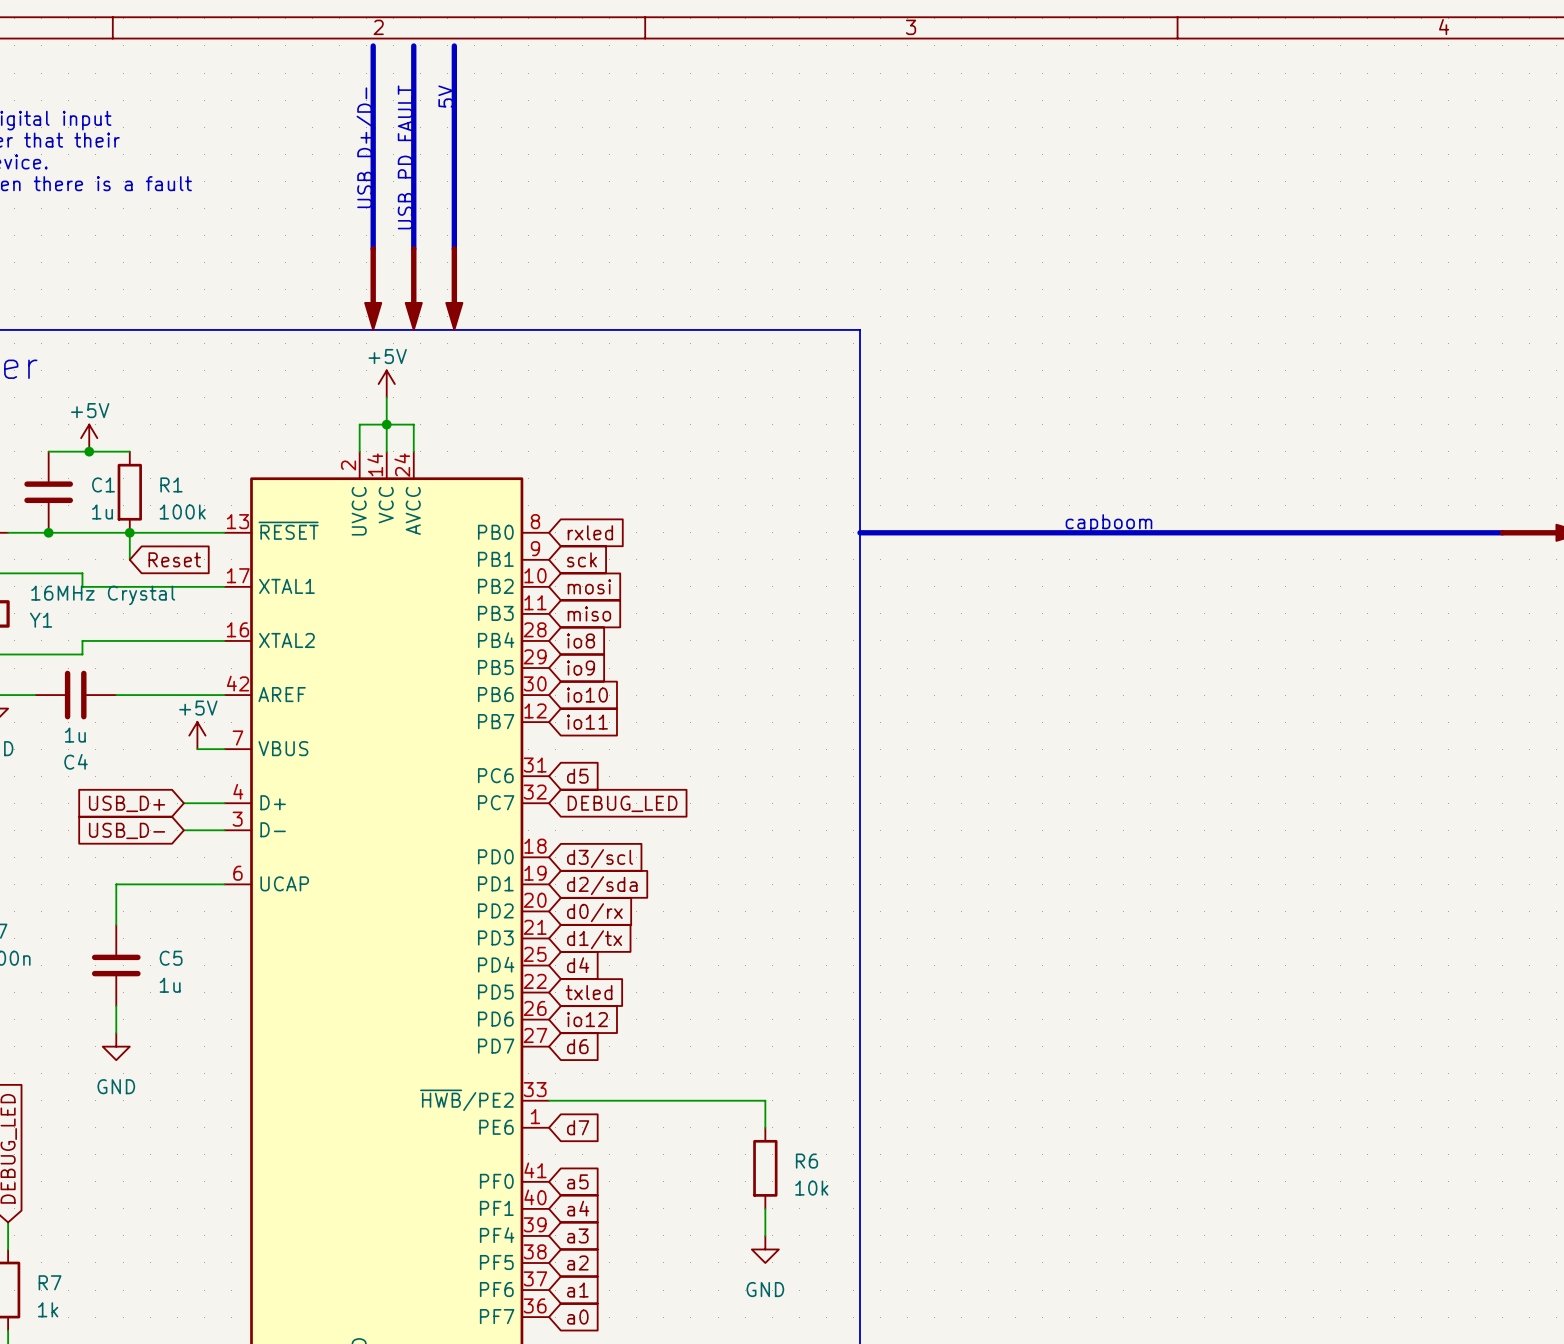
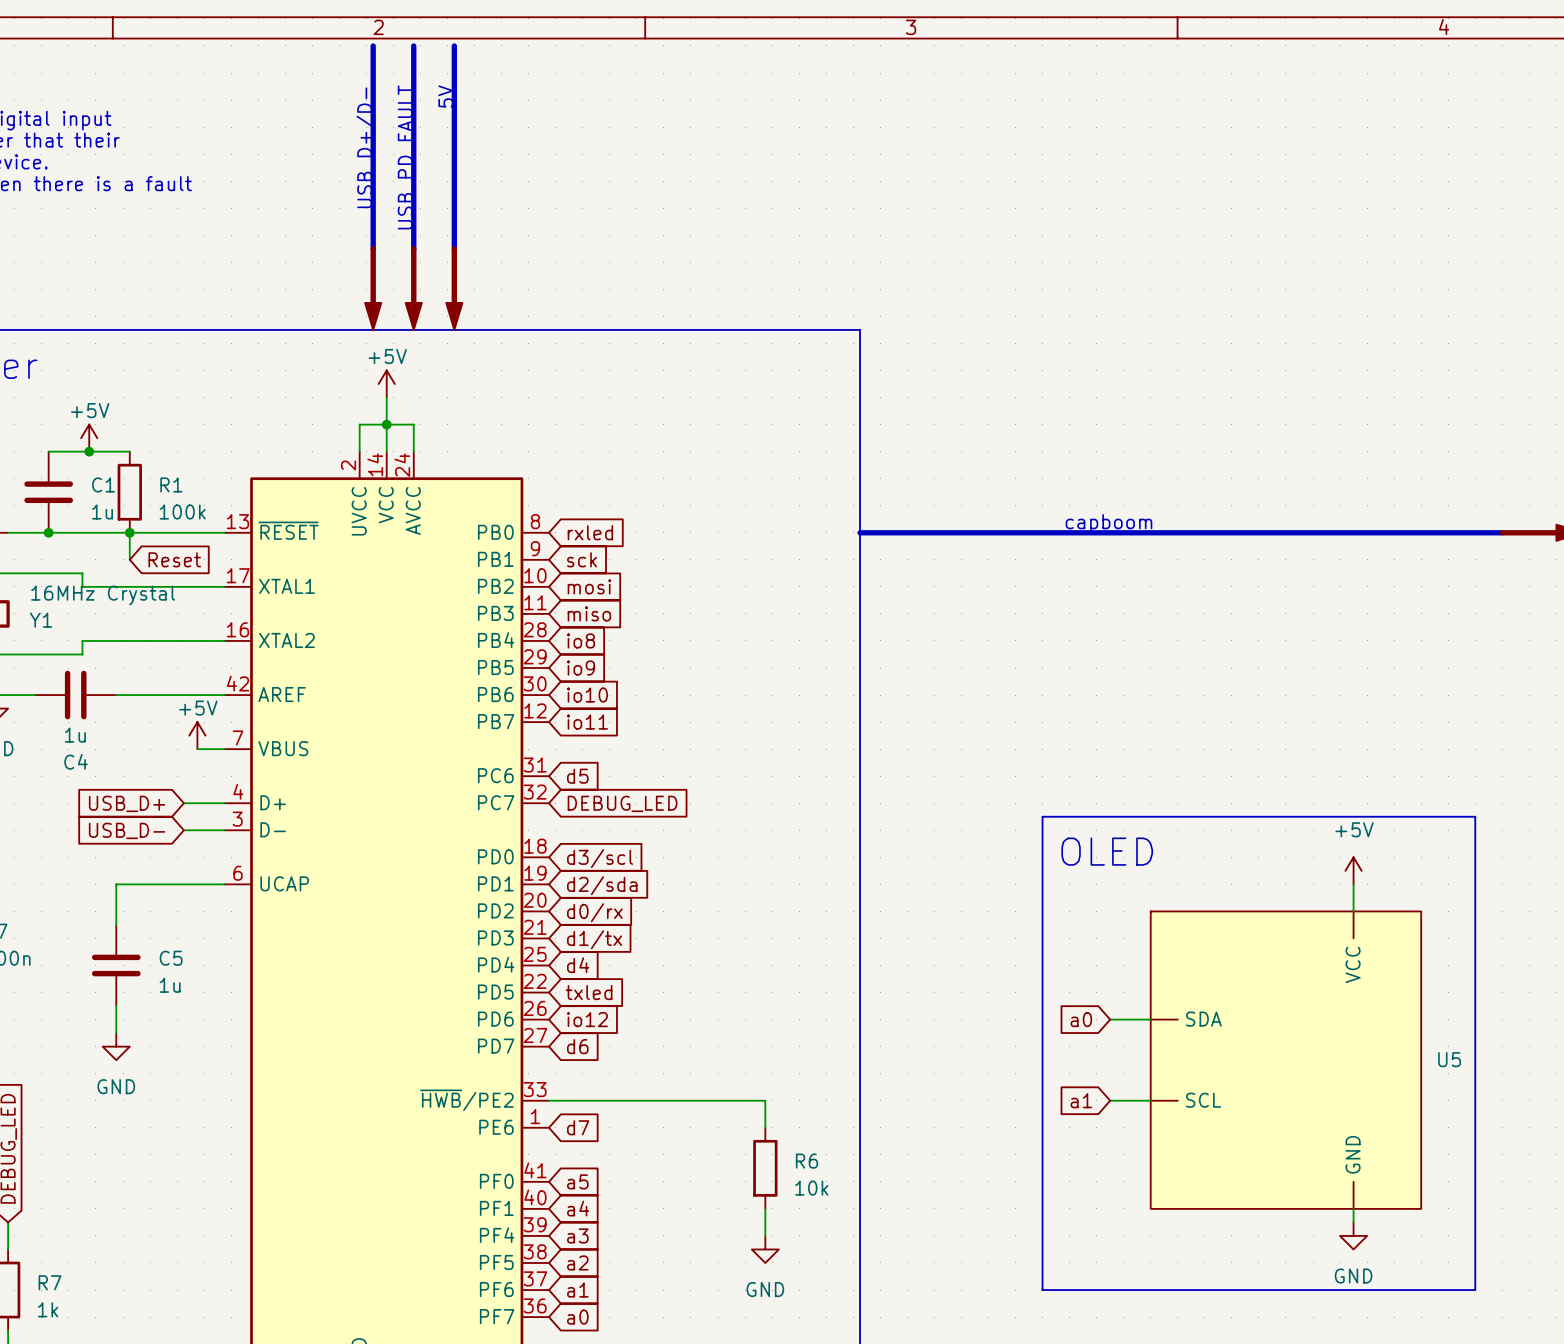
line: none -> (1042, 816) (1475, 816) (1475, 1290) (1042, 1290) (1042, 816)
text: none -> OLED (1107, 851)
power symbol: none -> +5V (1353, 870)
wire: none -> (1353, 884) (1353, 911)
global label: none -> a0 (1081, 1019)
wire: none -> (1110, 1019) (1150, 1019)
U5: none -> (1285, 1060)
global label: none -> a1 (1081, 1100)
wire: none -> (1110, 1100) (1150, 1100)
wire: none -> (1353, 1208) (1353, 1222)
power symbol: none -> GND (1353, 1235)

